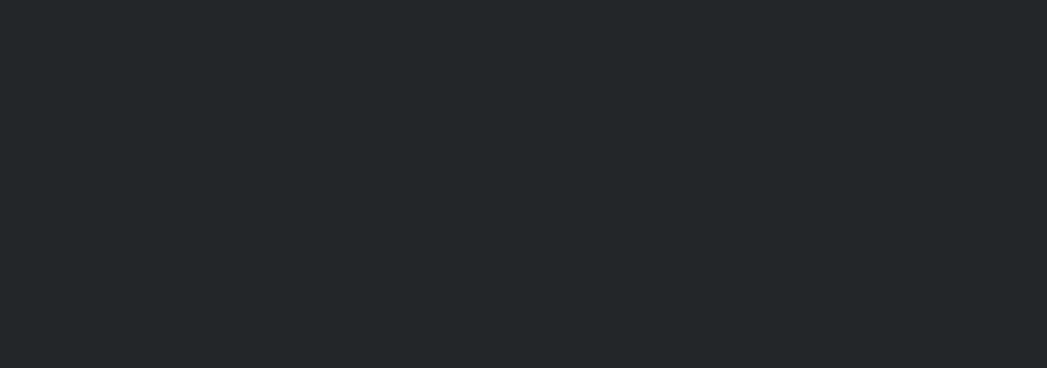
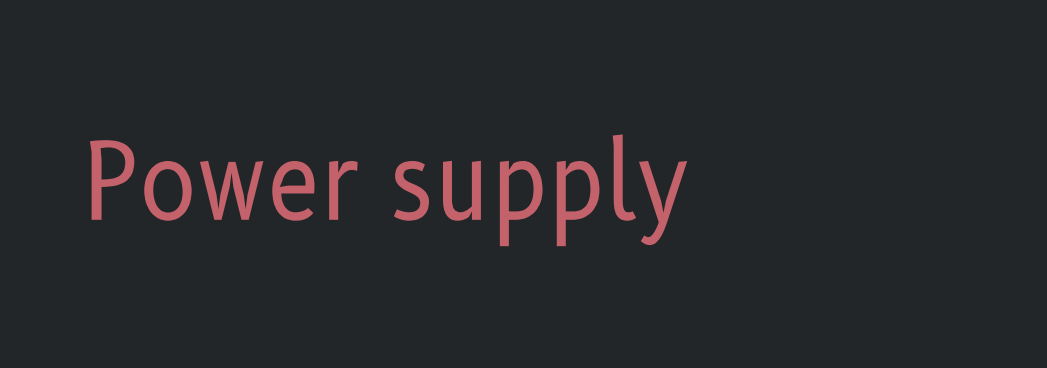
text: none -> Power supply (388, 190)

